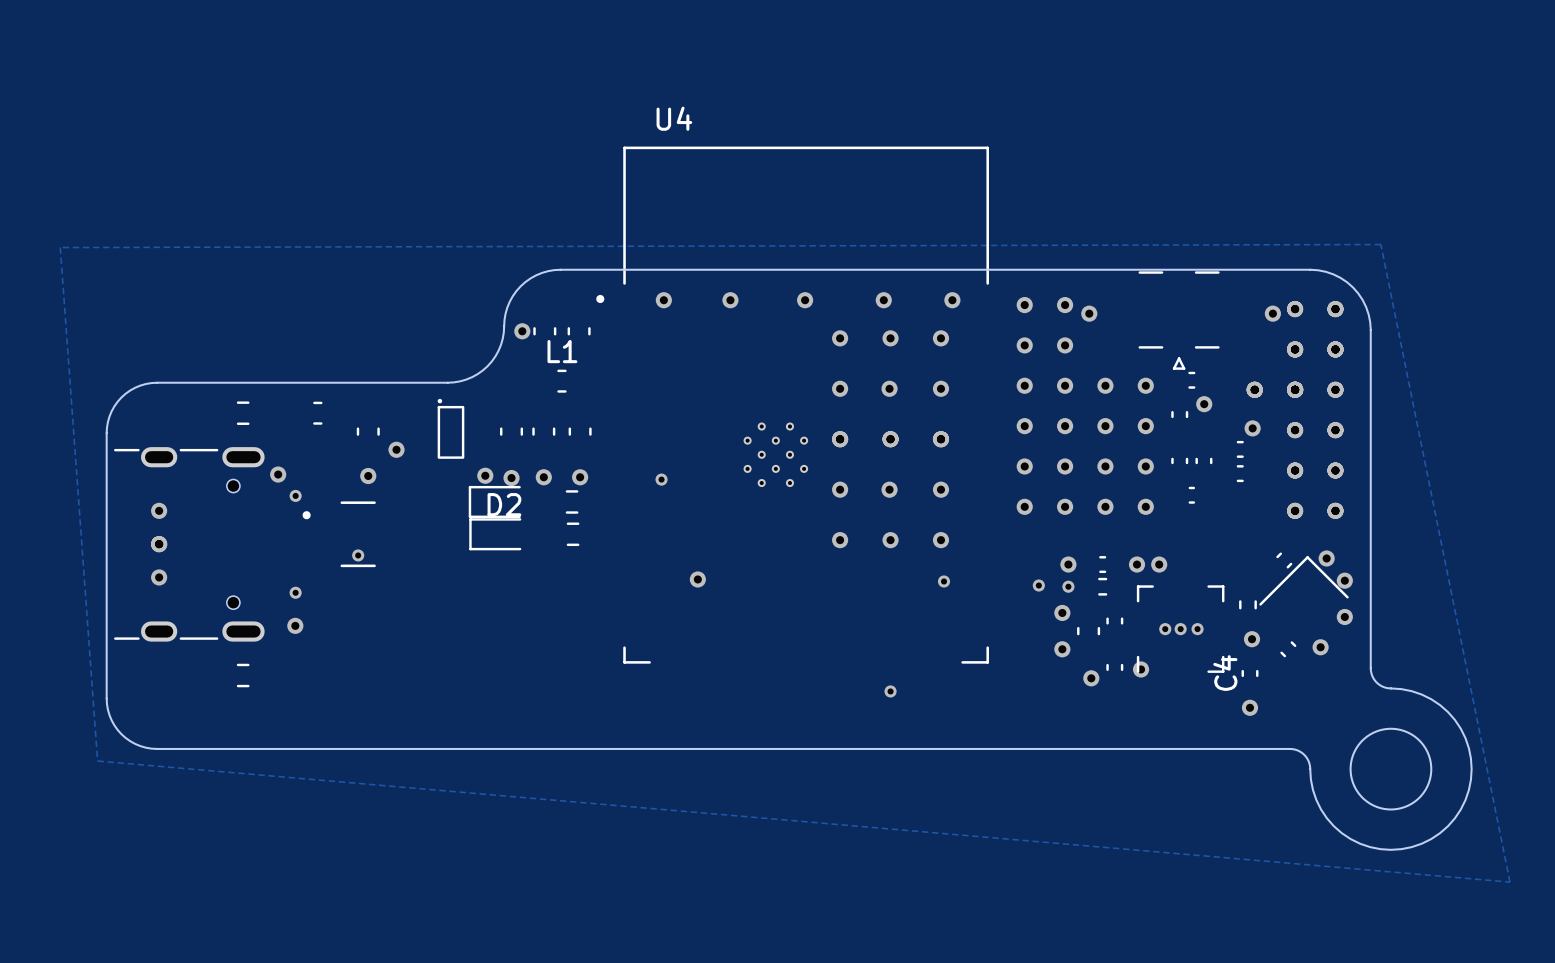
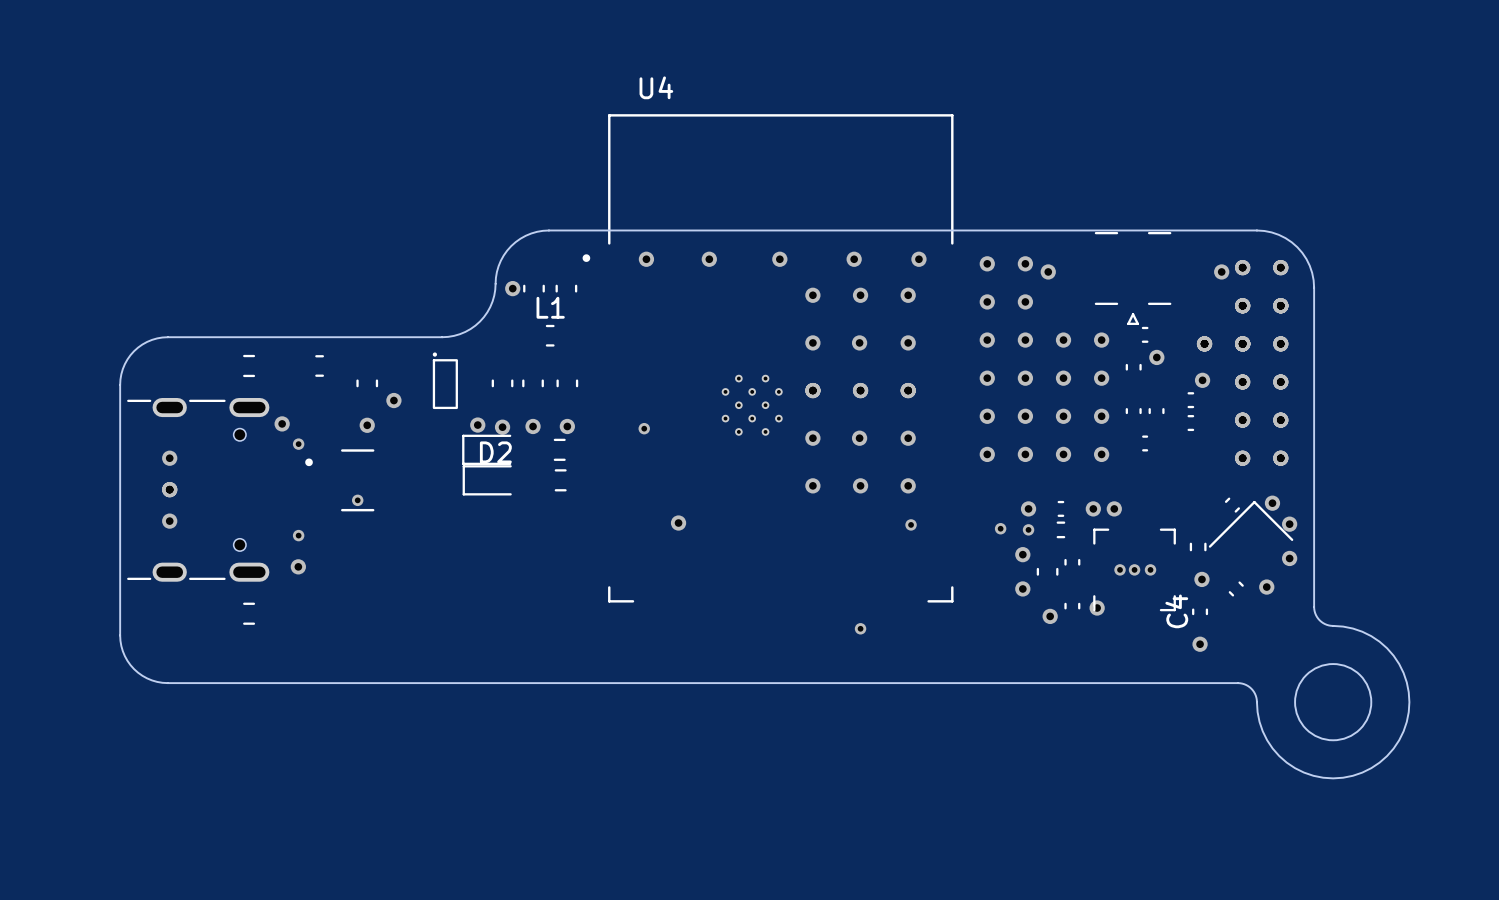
zone outline: (1380, 244) (1509, 882) (97, 761) (60, 247) (1380, 244) -> none

